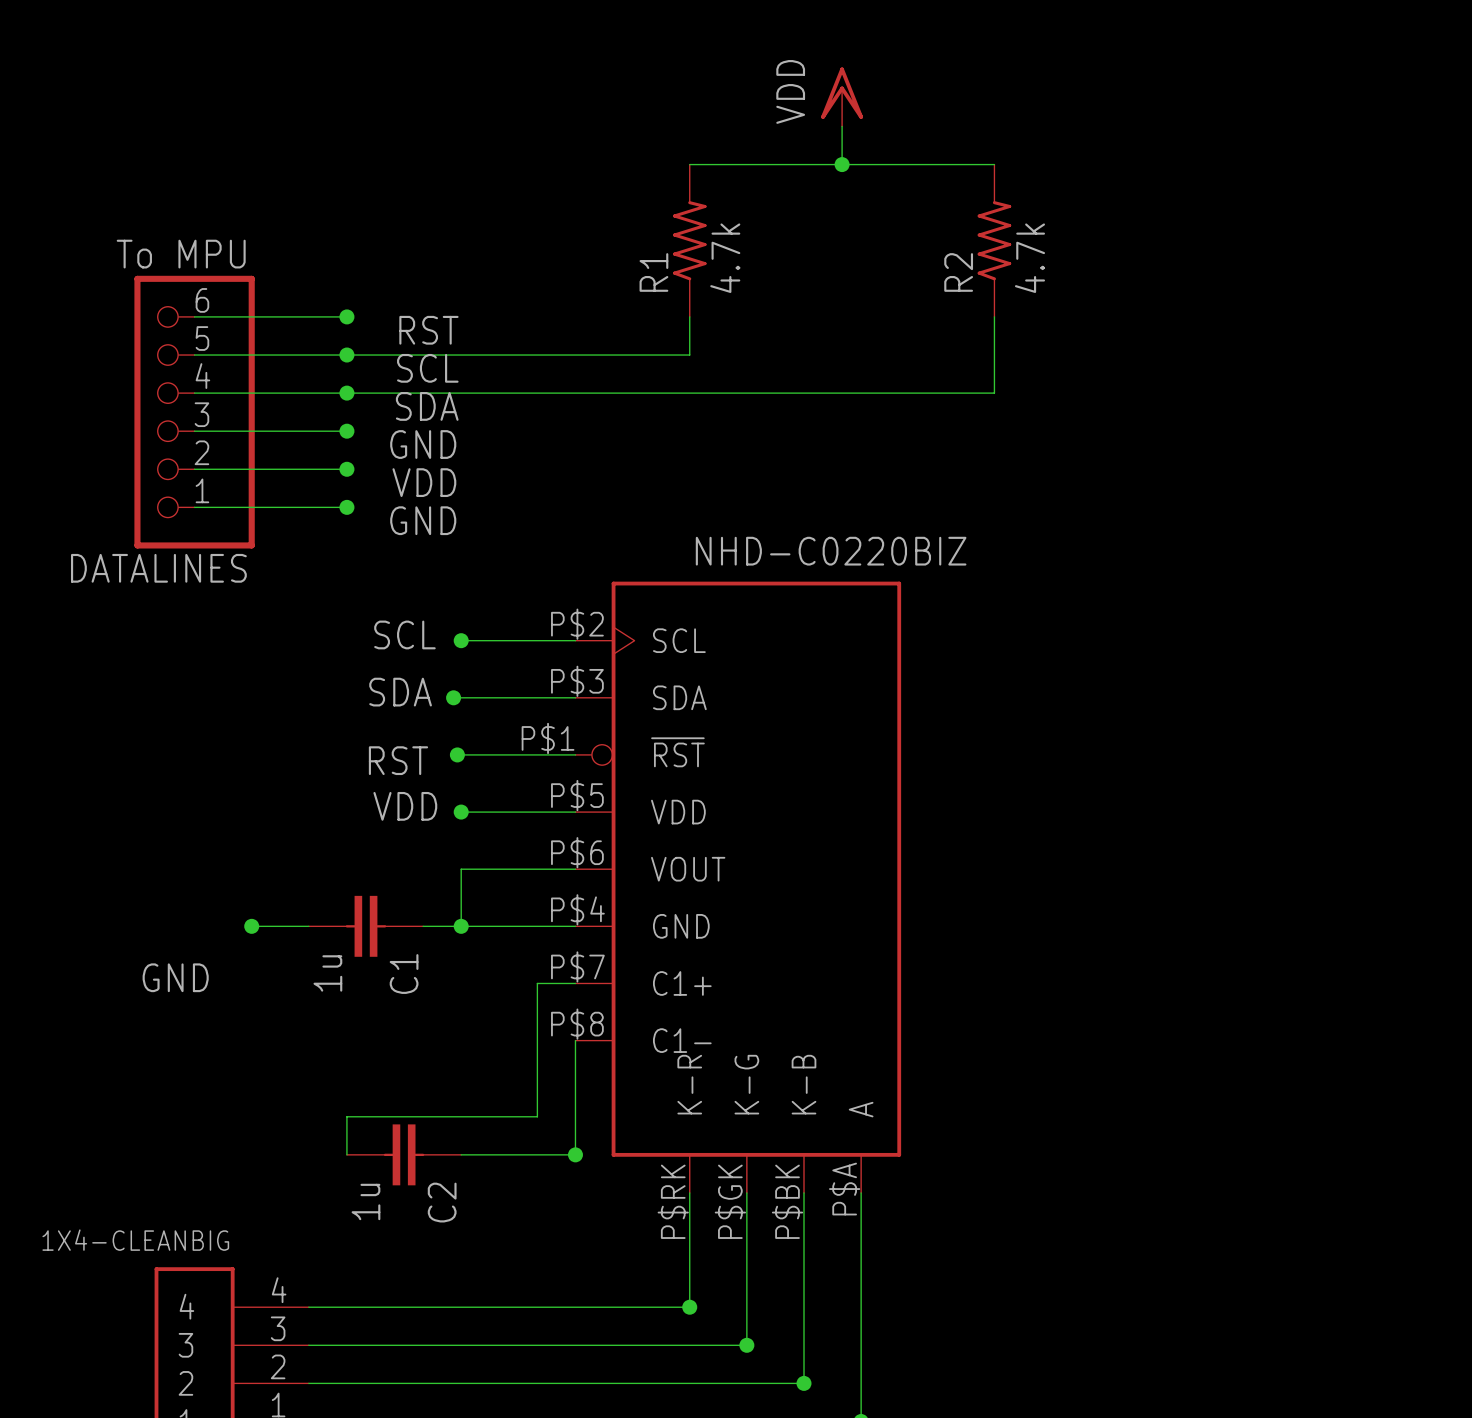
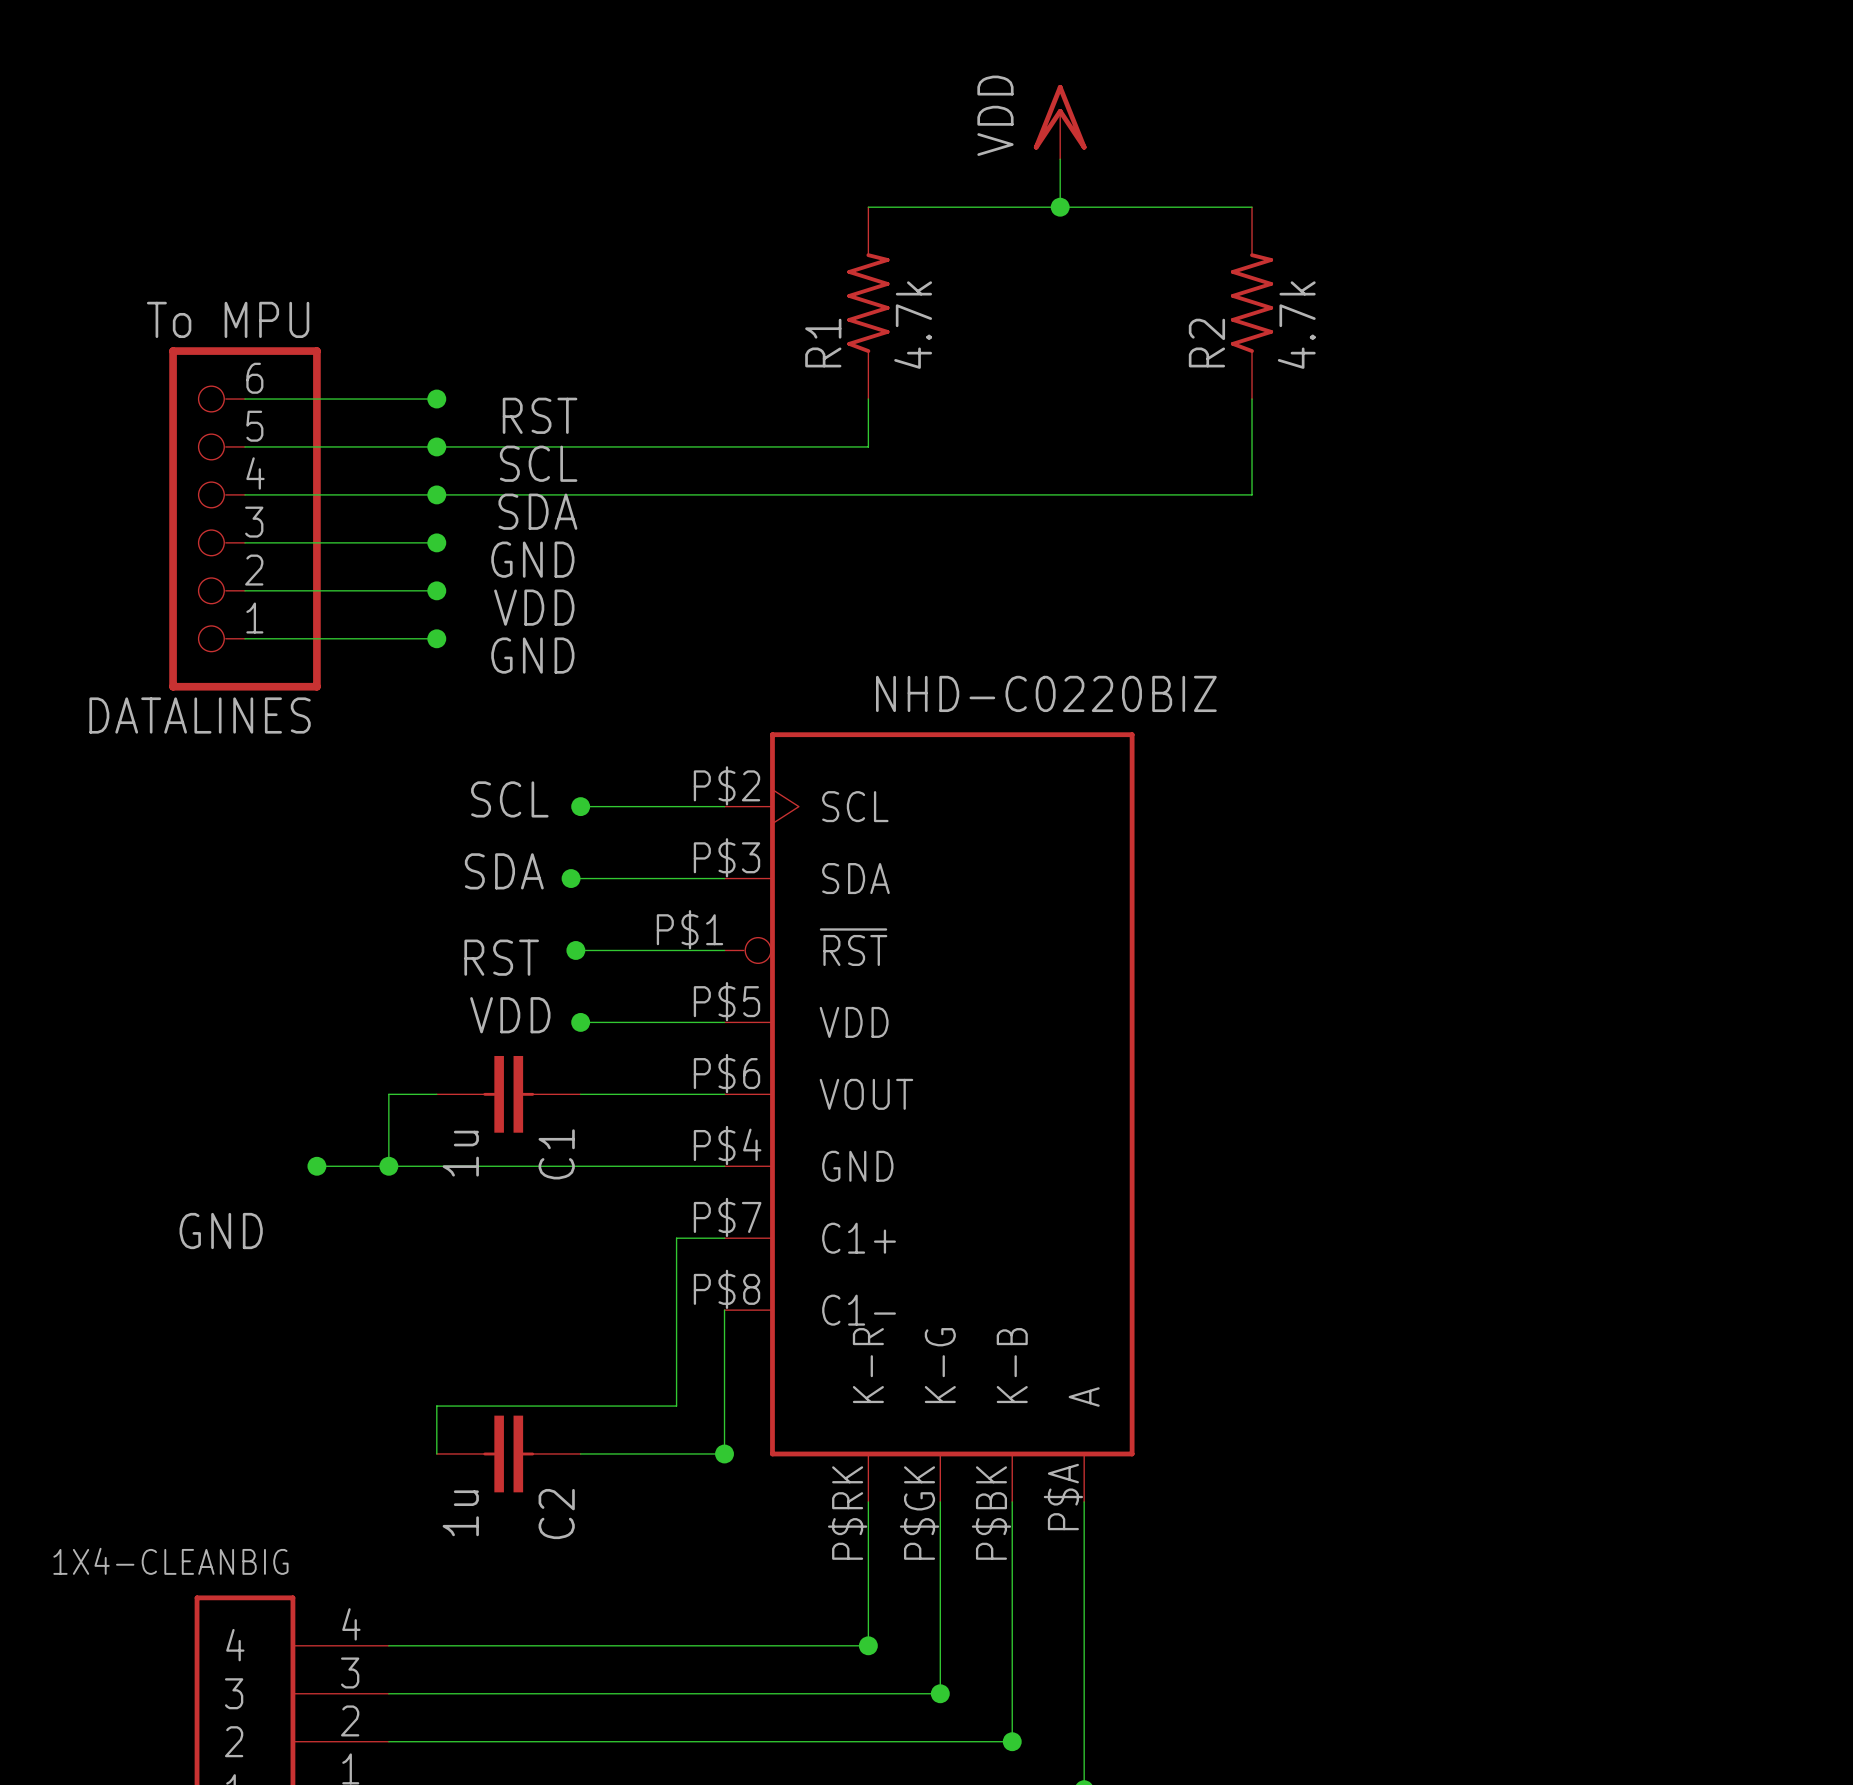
wire: none -> (436, 1094) (388, 1094) (388, 1166) (532, 1166)
wire: (461, 869) (461, 926) -> none
junction: none -> (388, 1166)
C1 position: (365, 926) -> (508, 1094)
junction: (461, 926) -> none

